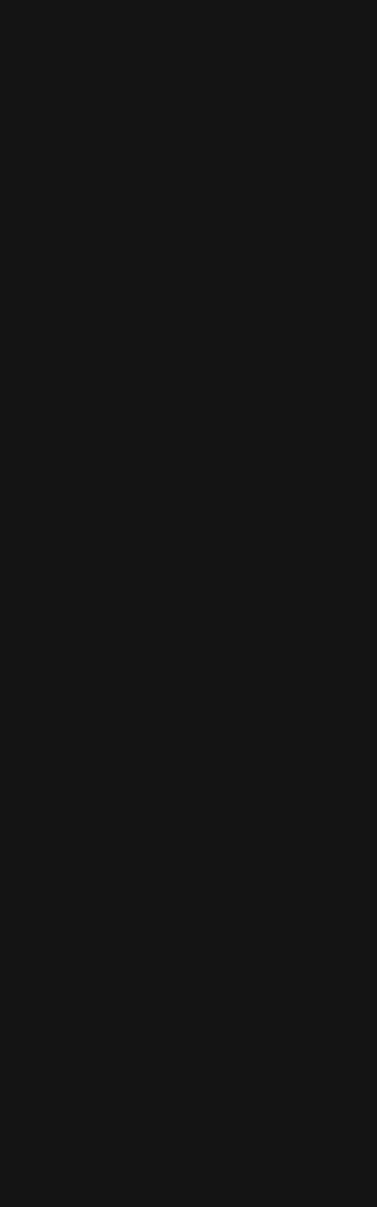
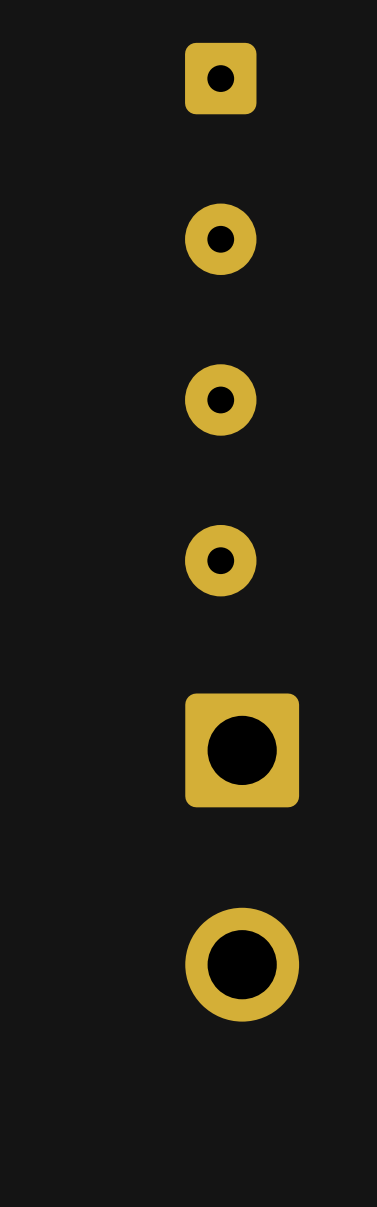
part: none -> (220, 319)
part: none -> (242, 857)

